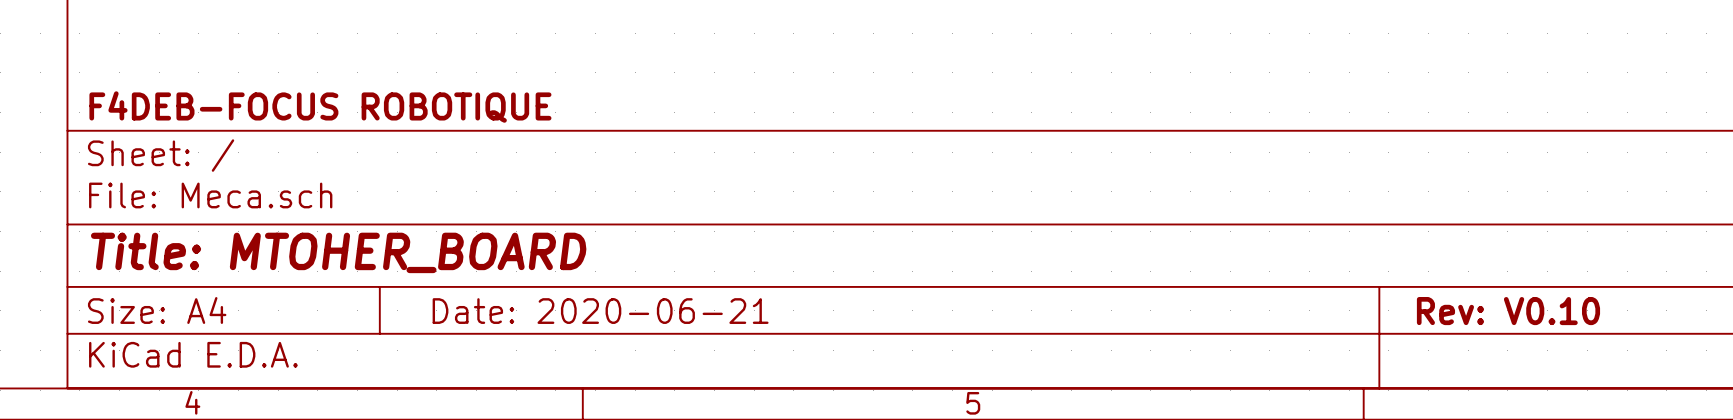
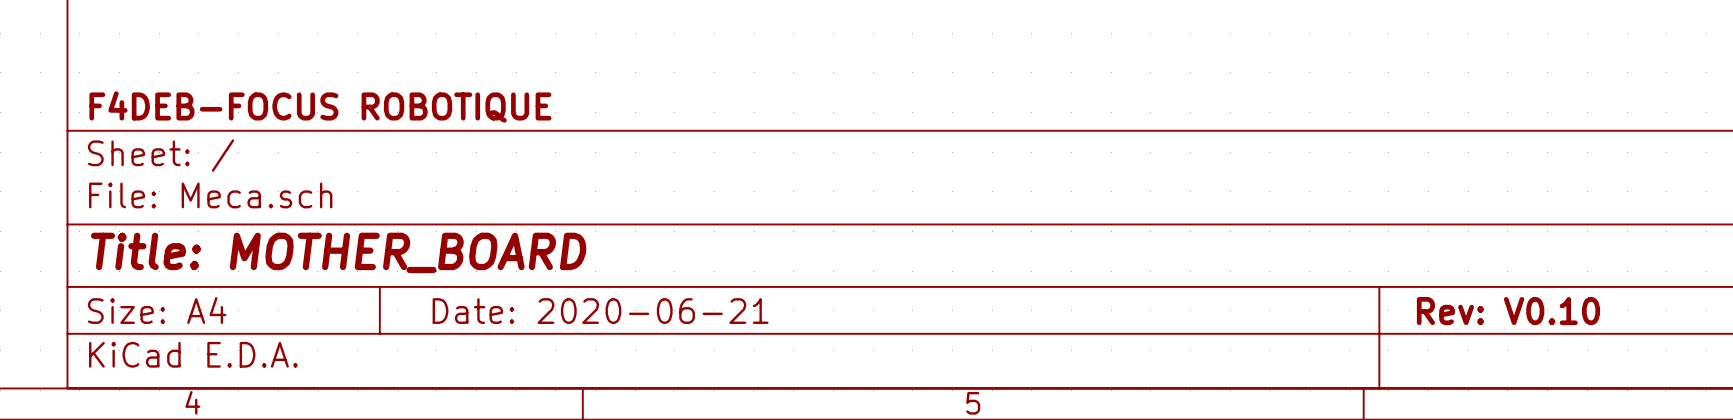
title block: Title: MTOHER_BOARD (338, 252) -> Title: MOTHER_BOARD (338, 252)

